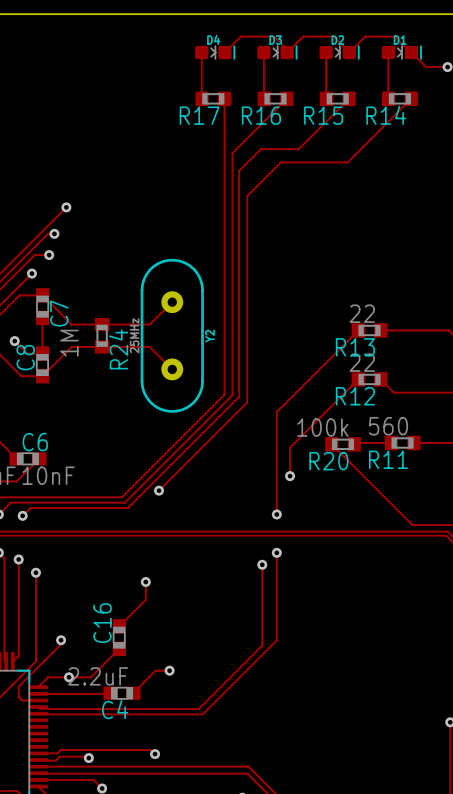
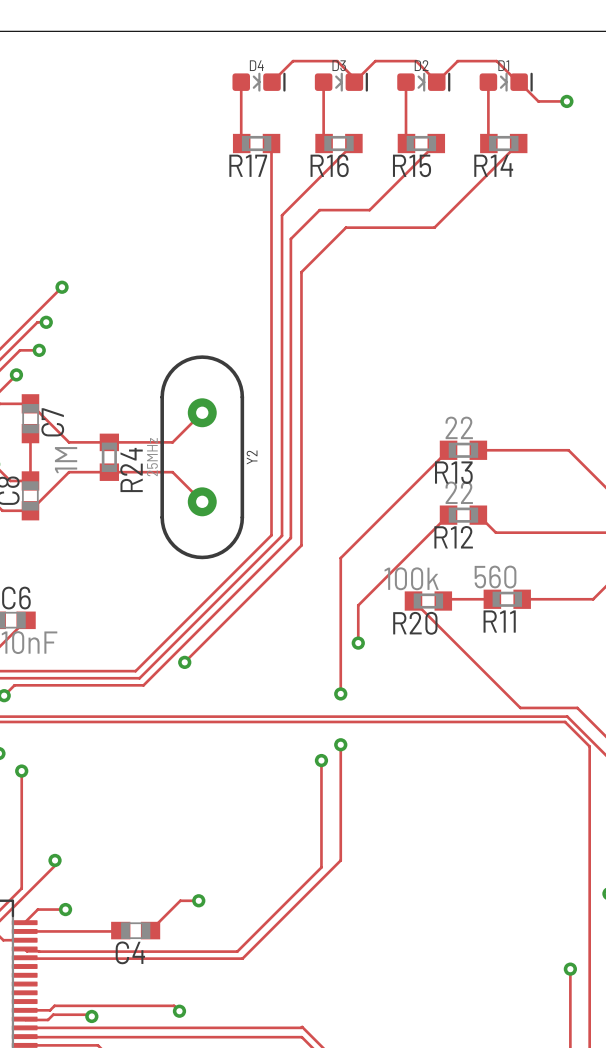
track: (145, 582) (145, 599) (119, 626) -> none
via: (145, 582) -> none
C16: (119, 637) -> none
track: (119, 648) (90, 677) (69, 677) -> none
C4 value: 2.2uF (98, 676) -> none

